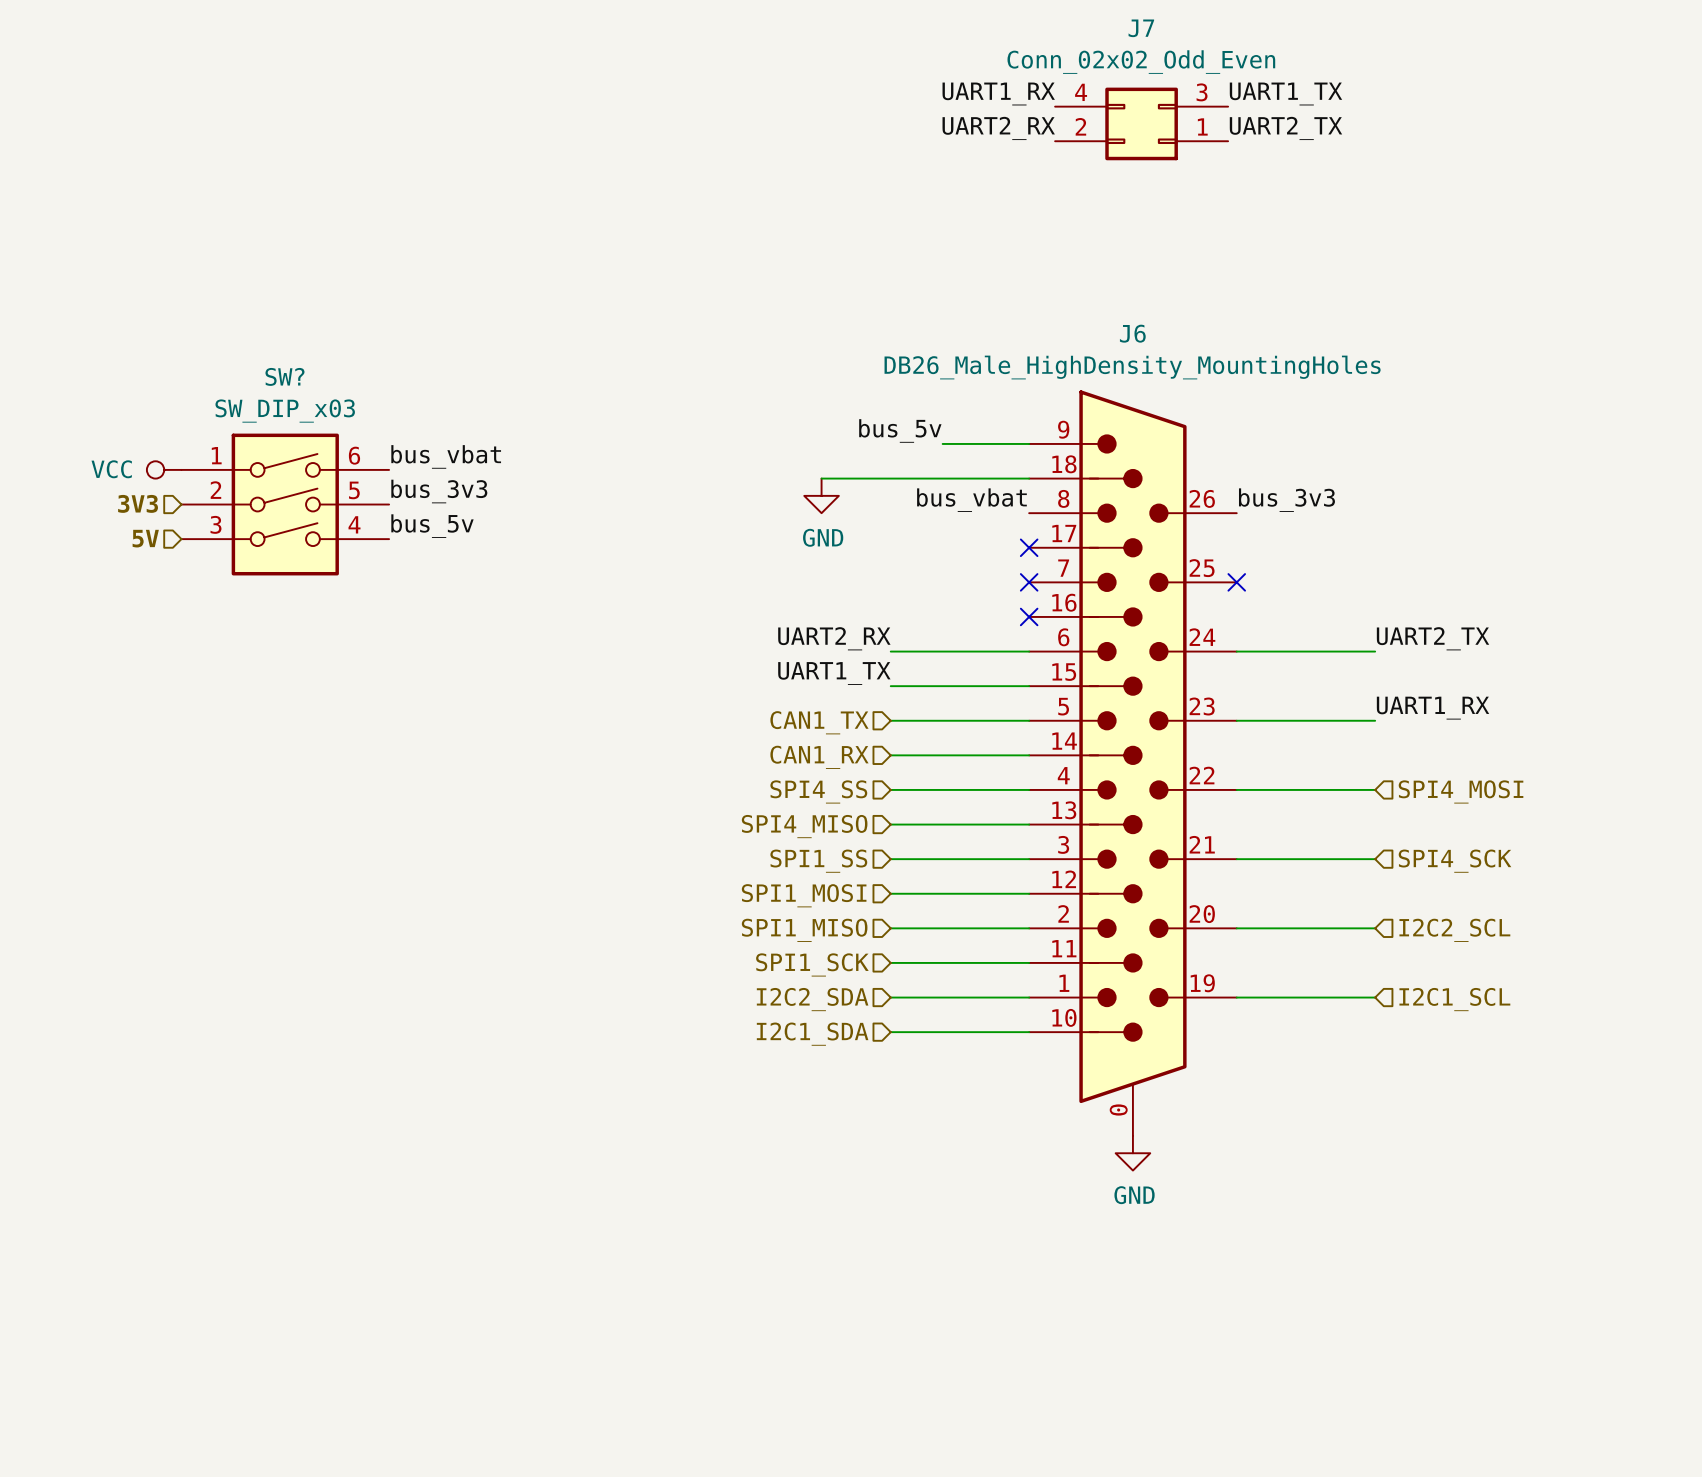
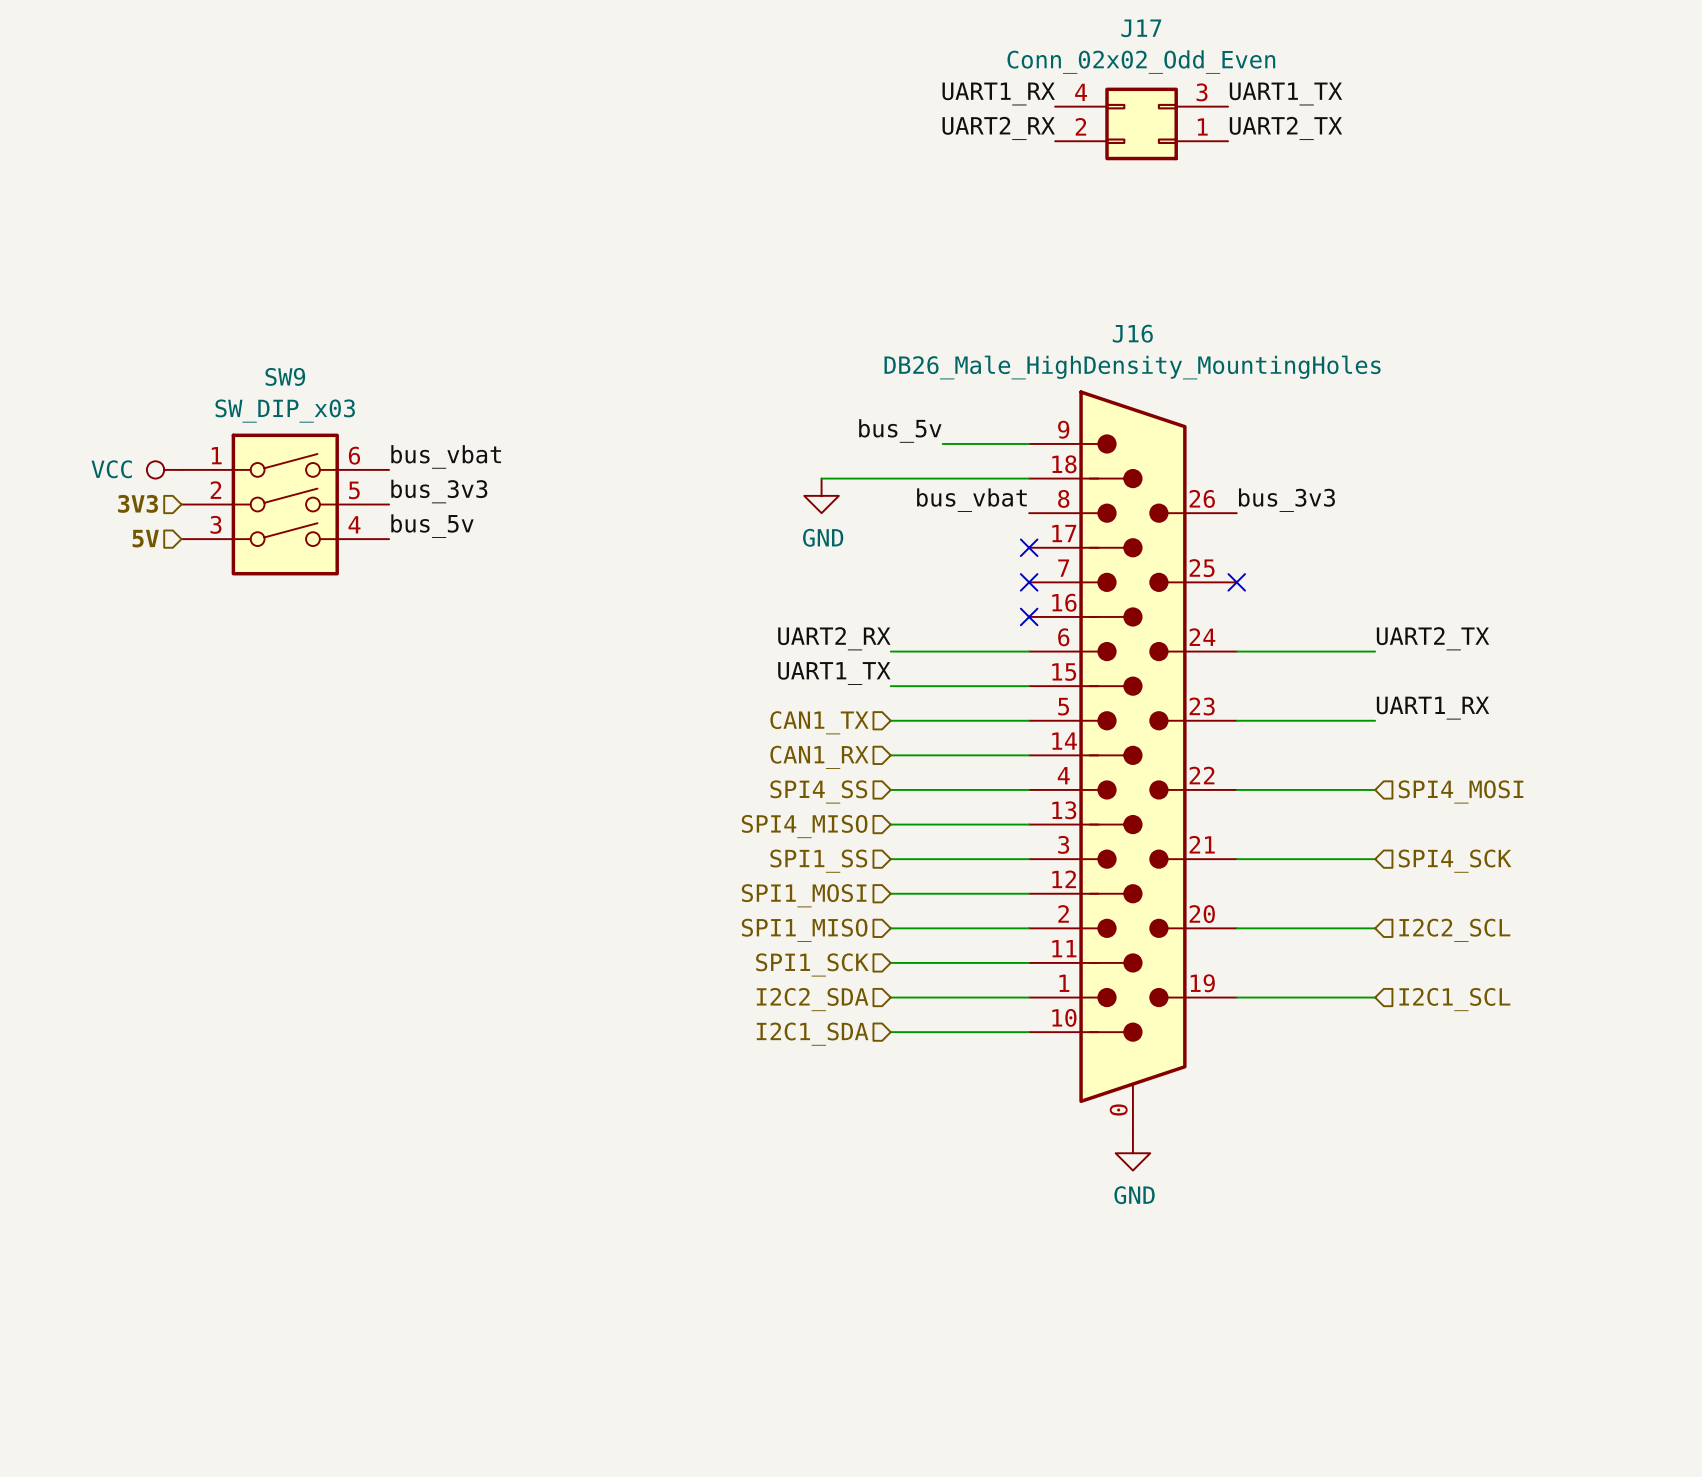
J7 name: J7 (1141, 28) -> J17 (1141, 28)
J6 name: J6 (1132, 333) -> J16 (1132, 333)
SW? name: SW? (284, 376) -> SW9 (285, 376)

